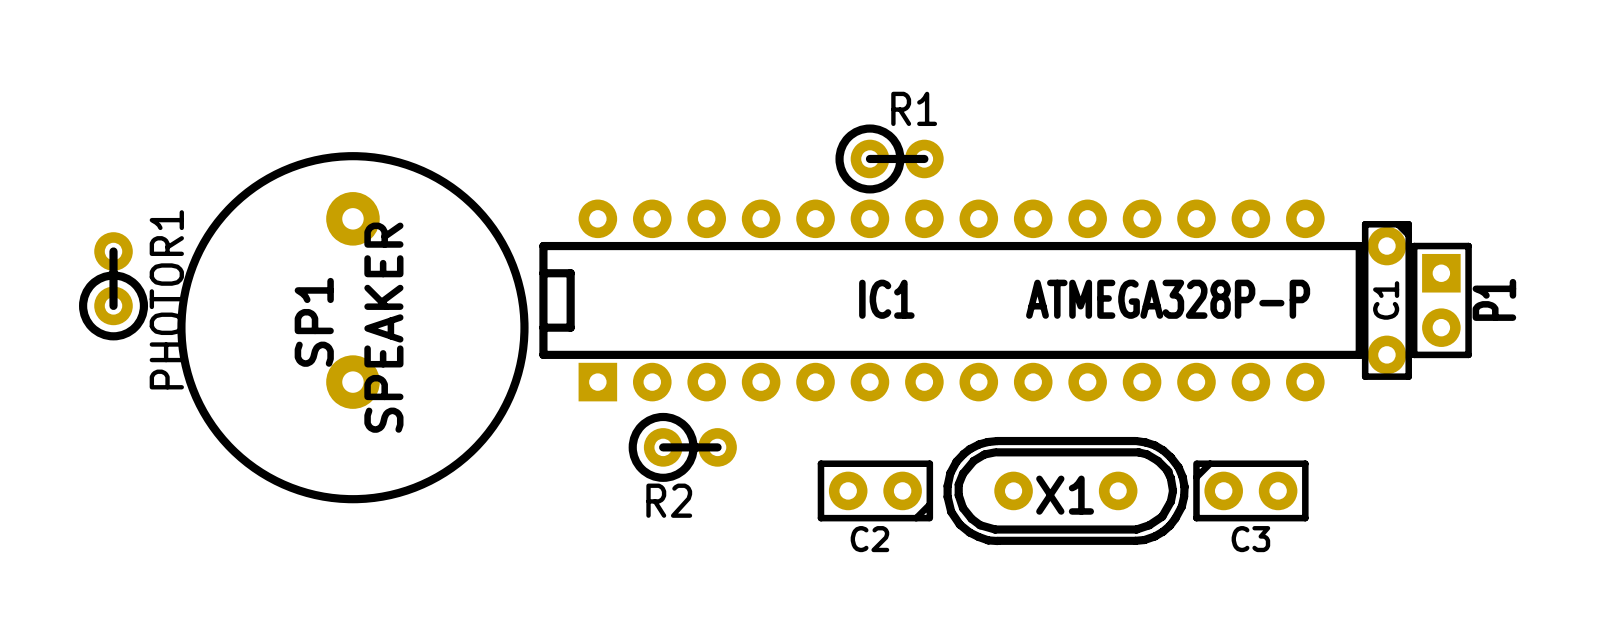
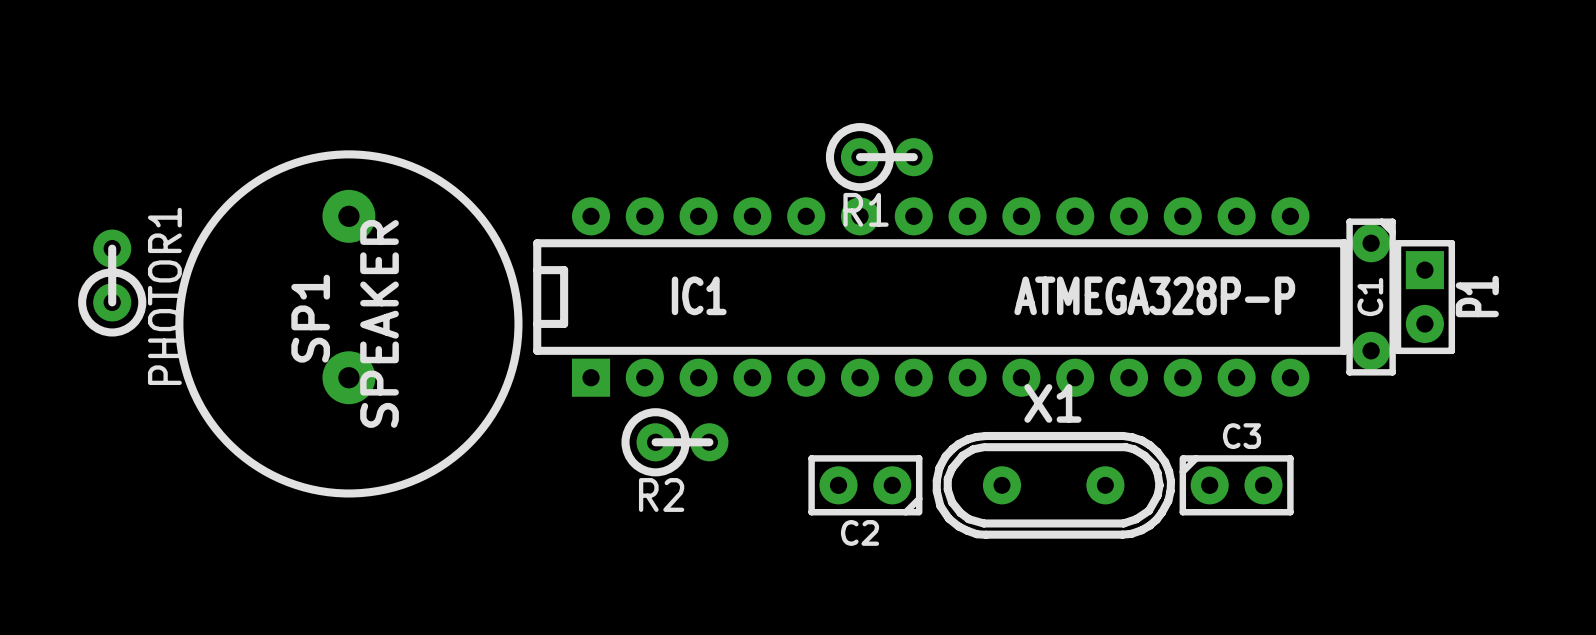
R1 name position: R1 (914, 108) -> R1 (866, 209)
IC1 name position: IC1 (886, 299) -> IC1 (699, 295)
X1 name position: X1 (1065, 495) -> X1 (1052, 403)
C3 name position: C3 (1250, 539) -> C3 (1241, 436)

